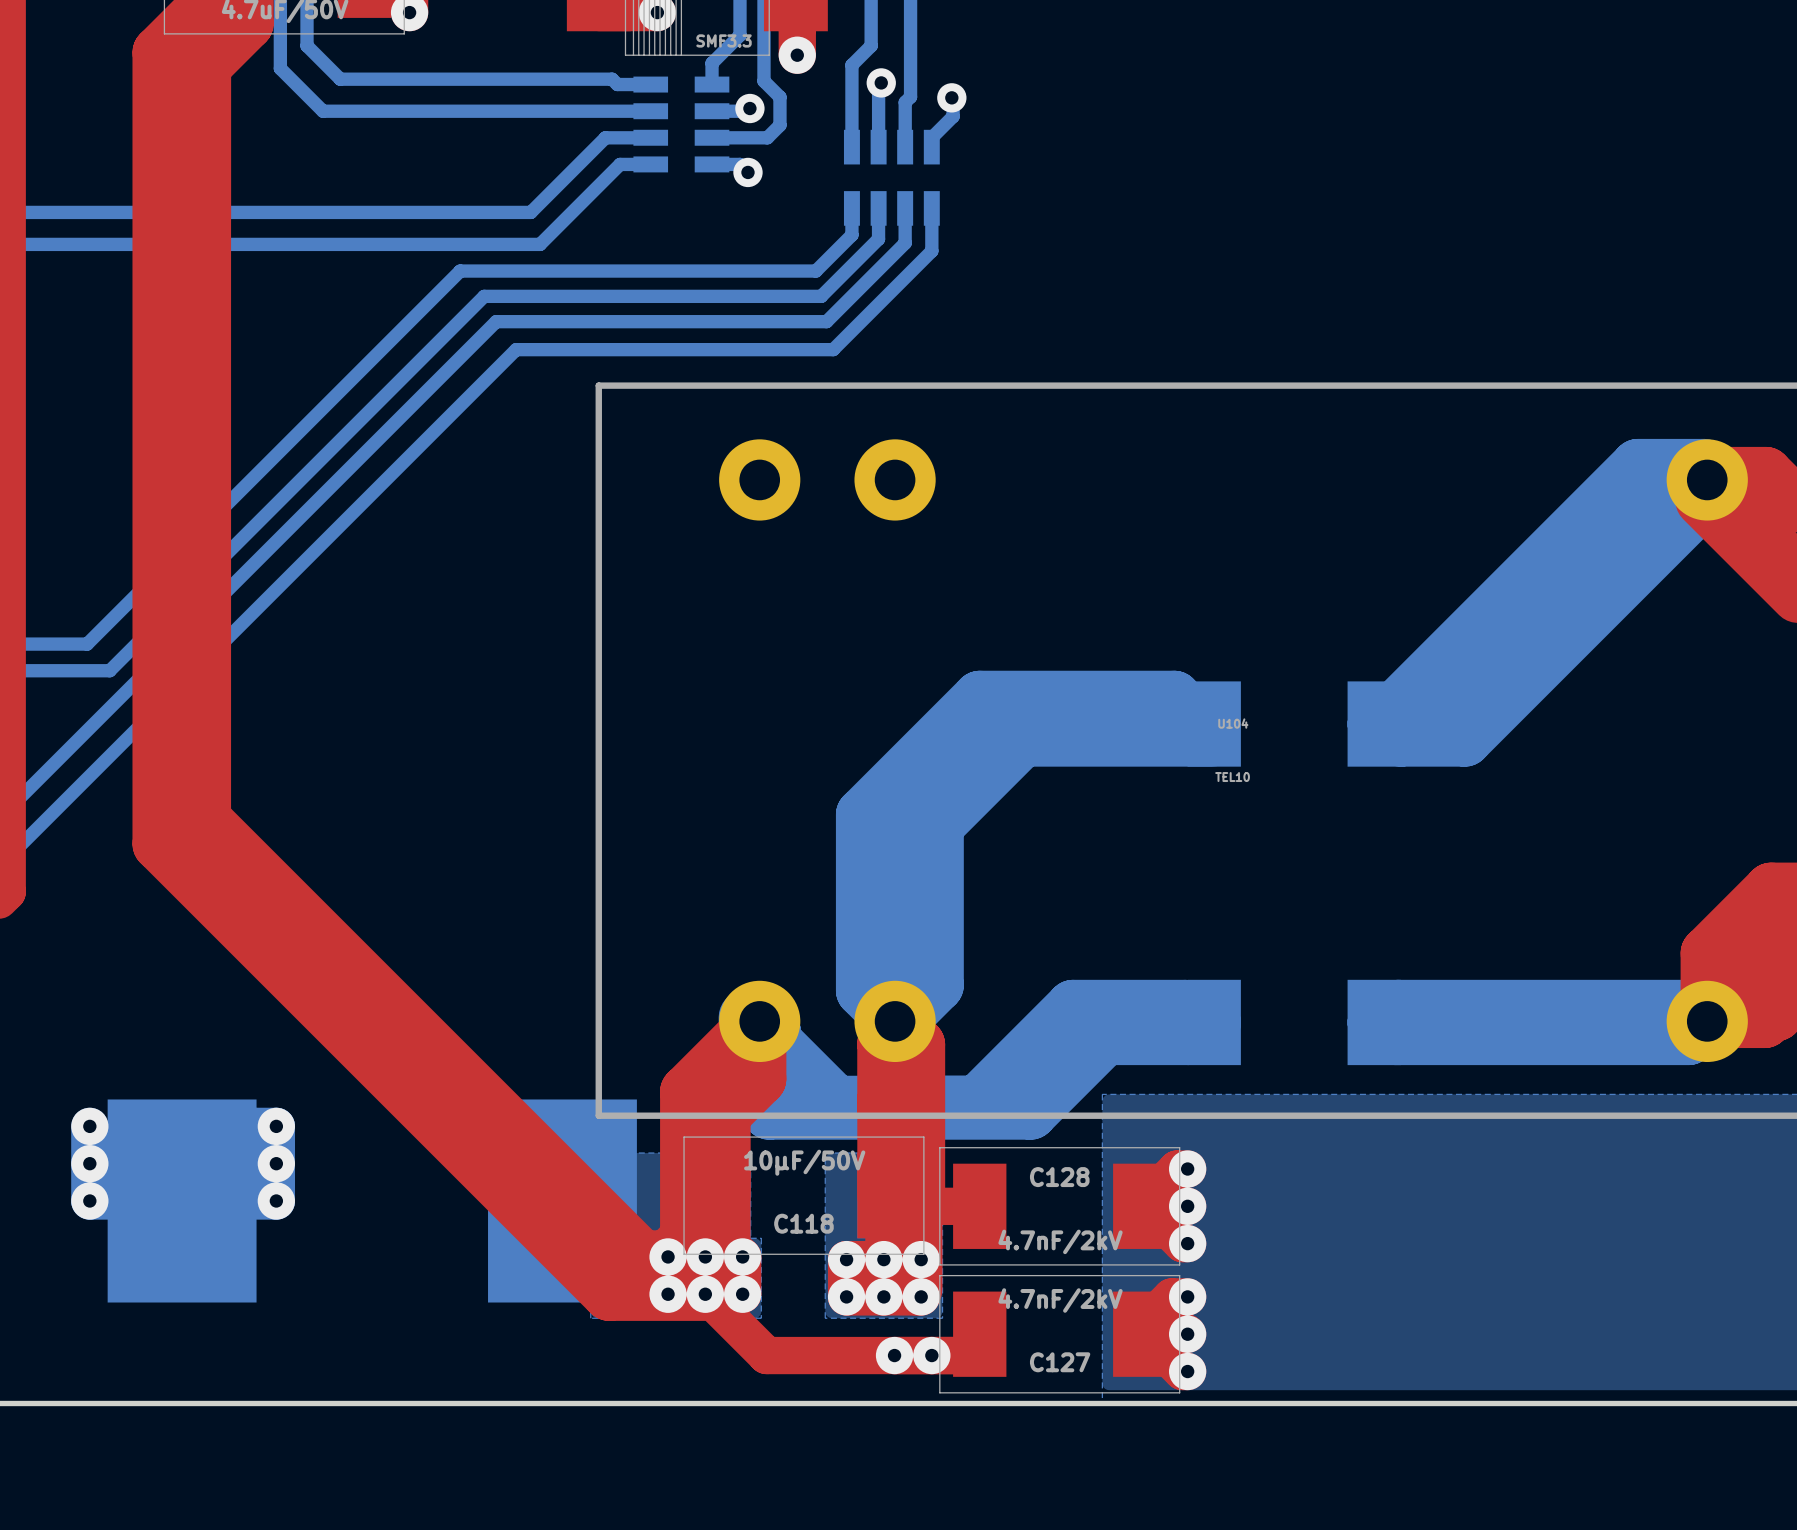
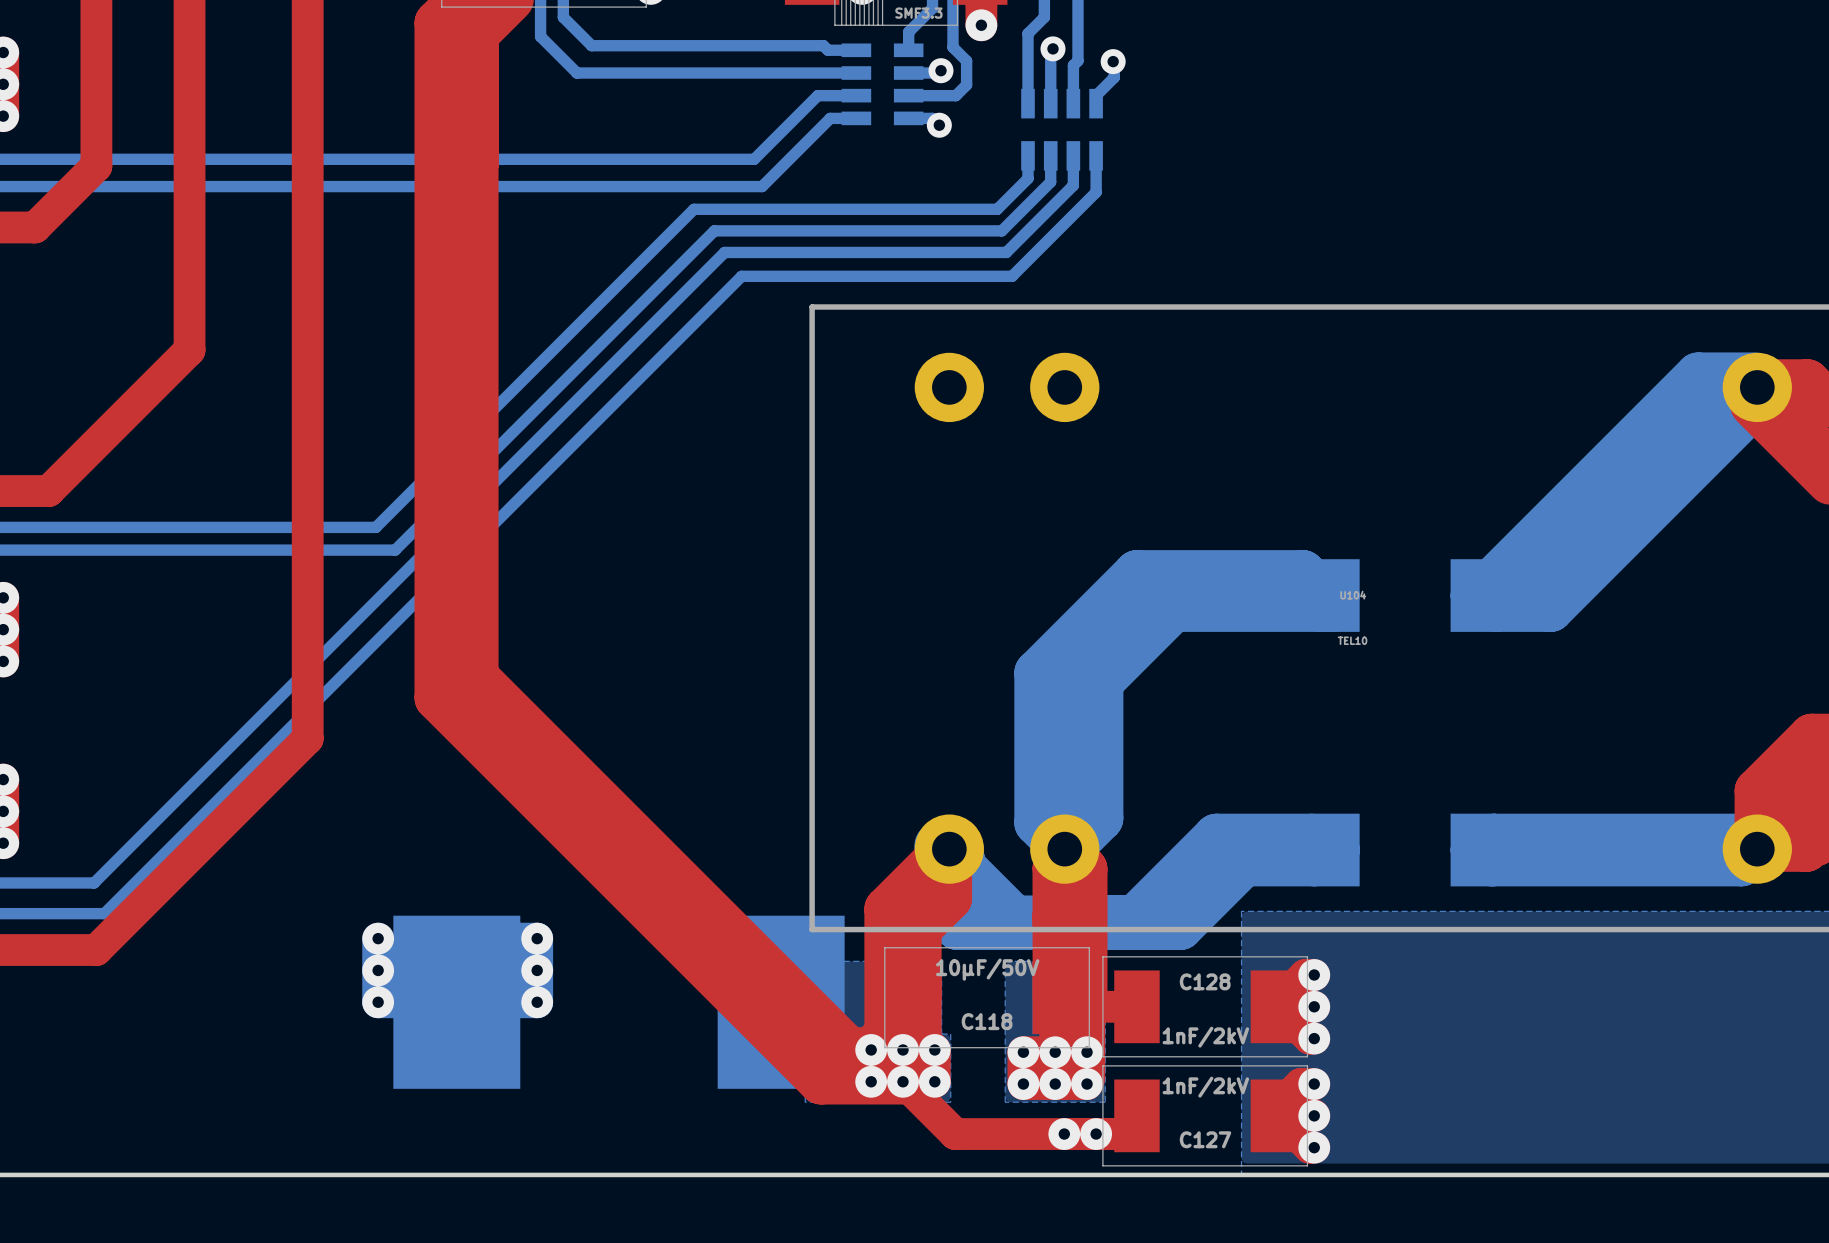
C128 value: 4.7nF/2kV (1060, 1241) -> 1nF/2kV (1205, 1037)
C127 value: 4.7nF/2kV (1060, 1300) -> 1nF/2kV (1205, 1087)

